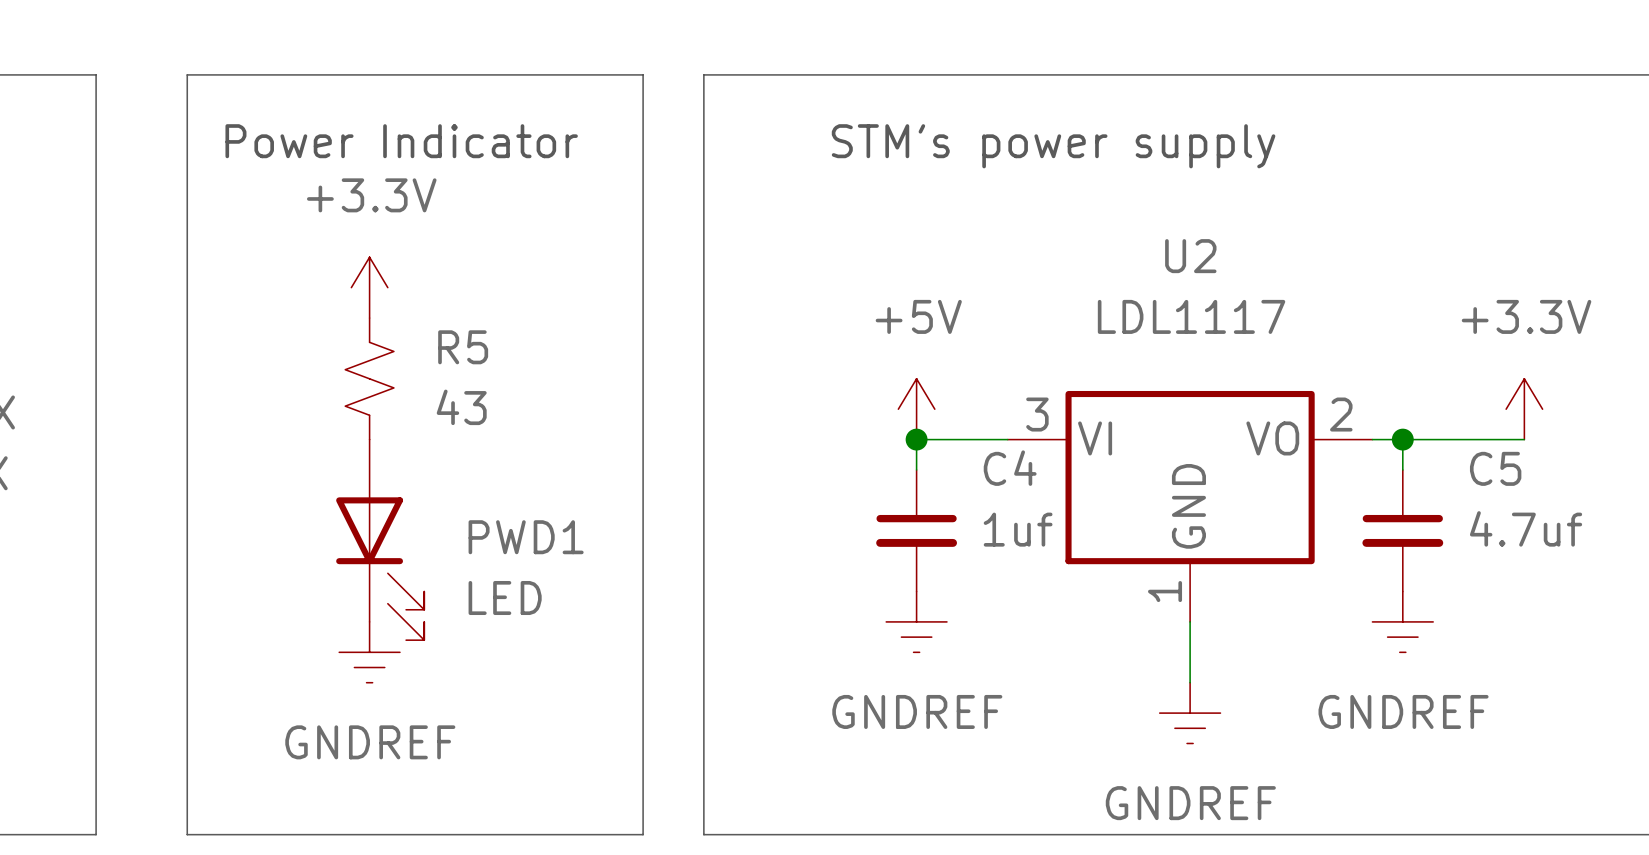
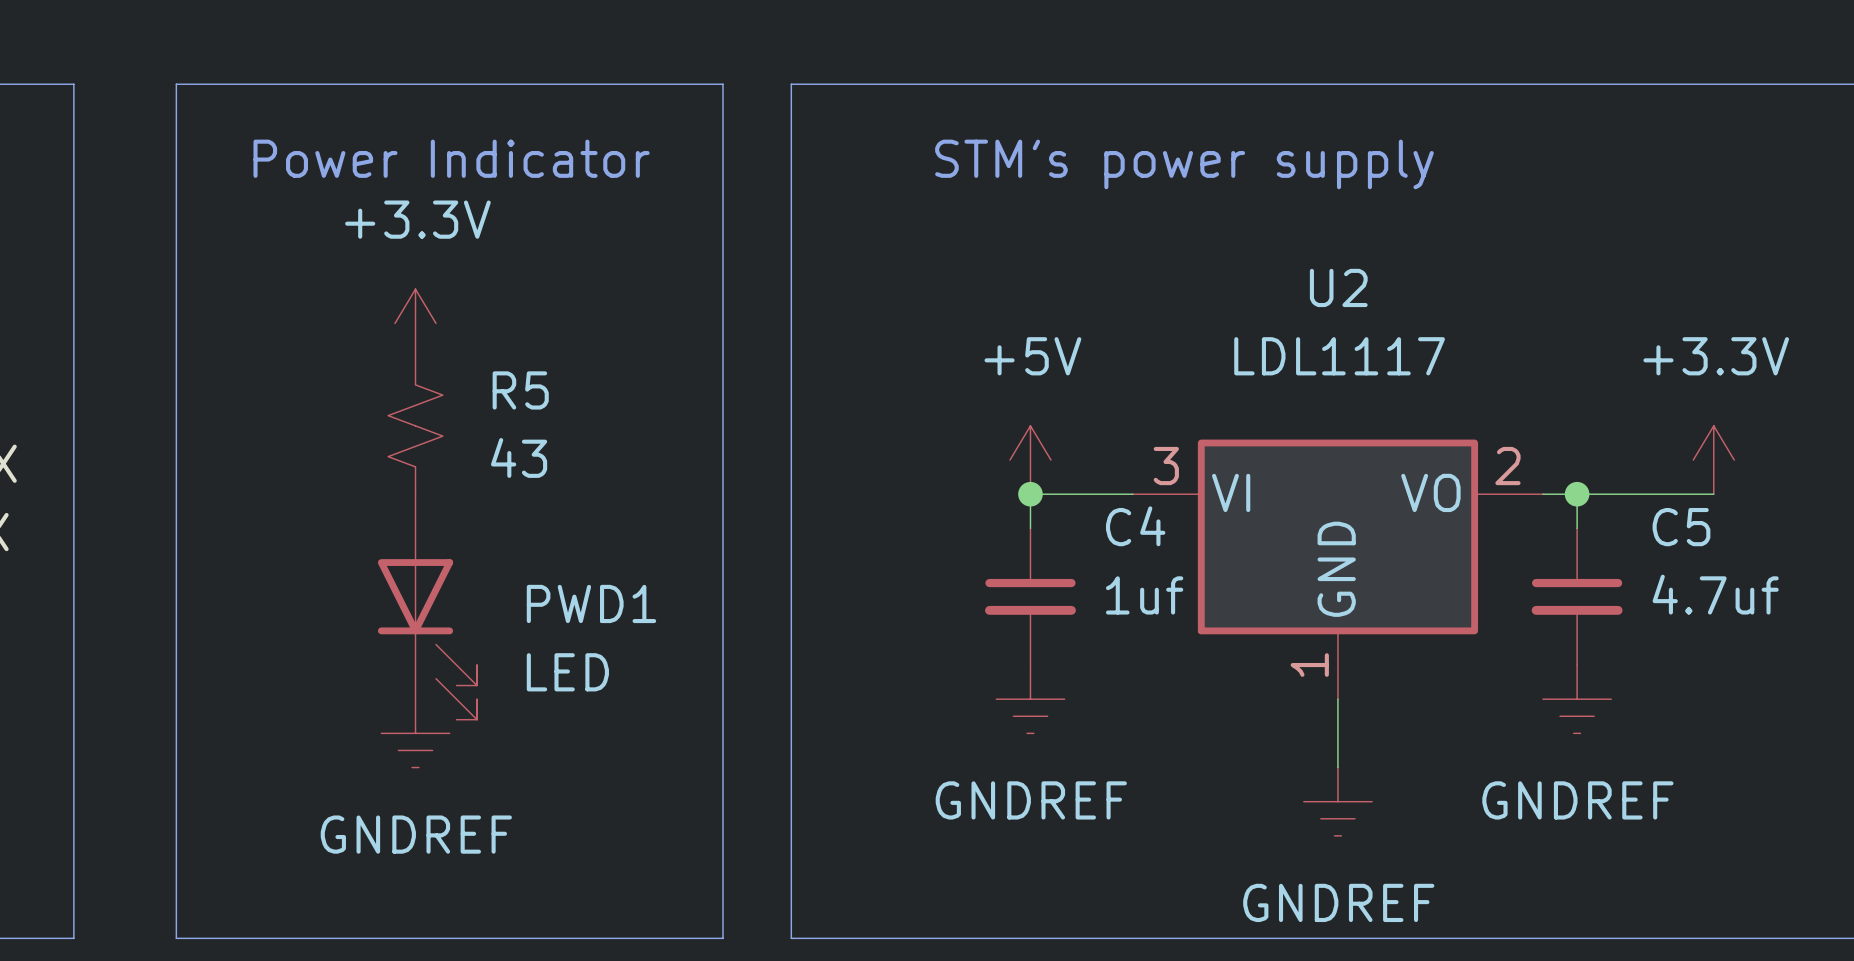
line: (65, 74) (96, 74) (96, 834) (65, 834) -> (73, 84) (73, 938)
line: (187, 74) (187, 834) -> (210, 84) (176, 84) (176, 938) (210, 938)

